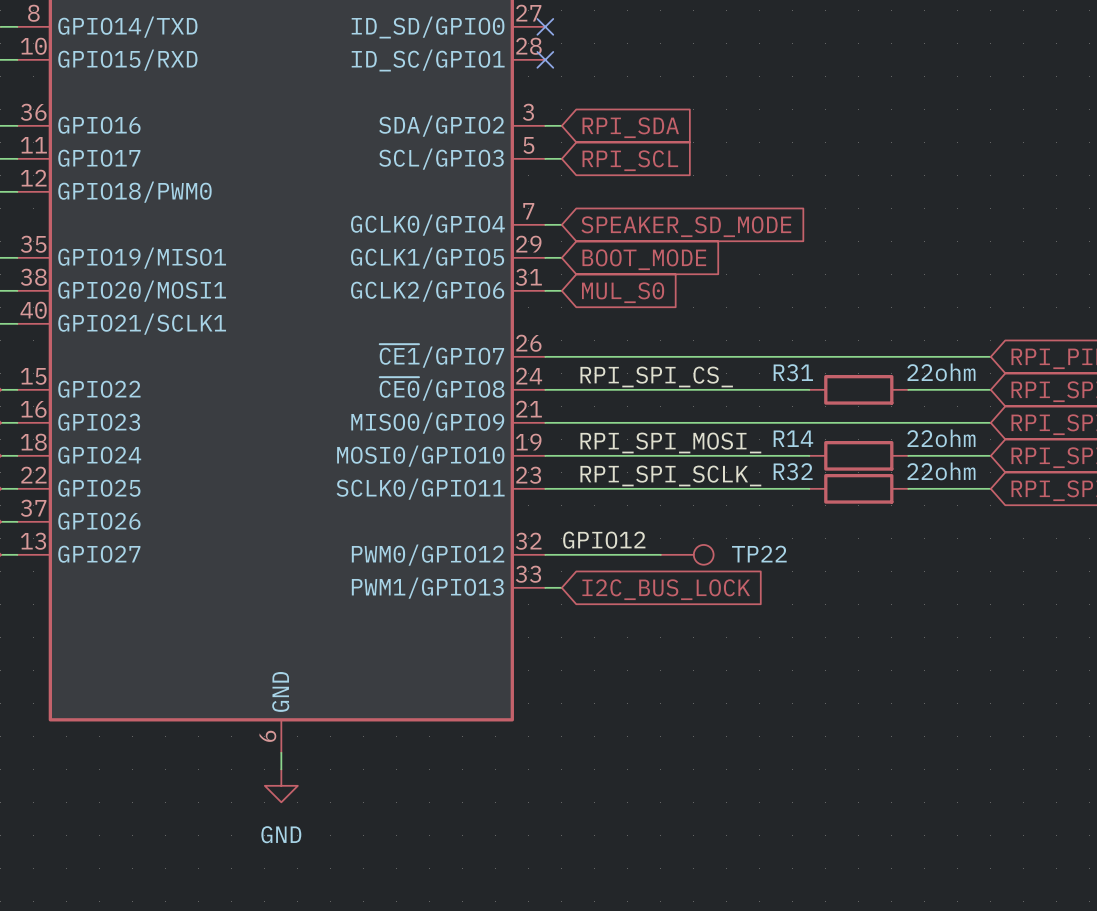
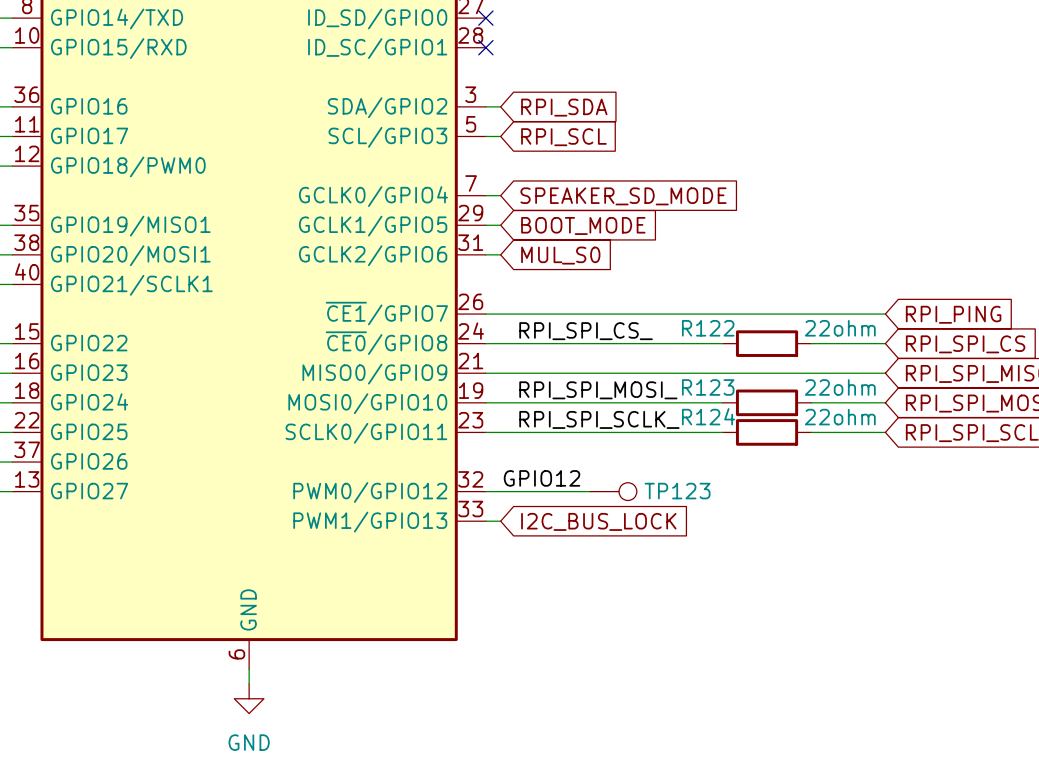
R31 name: R31 (793, 372) -> R122 (708, 328)
R14 name: R14 (793, 438) -> R123 (708, 387)
R32 name: R32 (793, 471) -> R124 (708, 416)
TP22 name: TP22 (759, 554) -> TP123 (677, 491)

